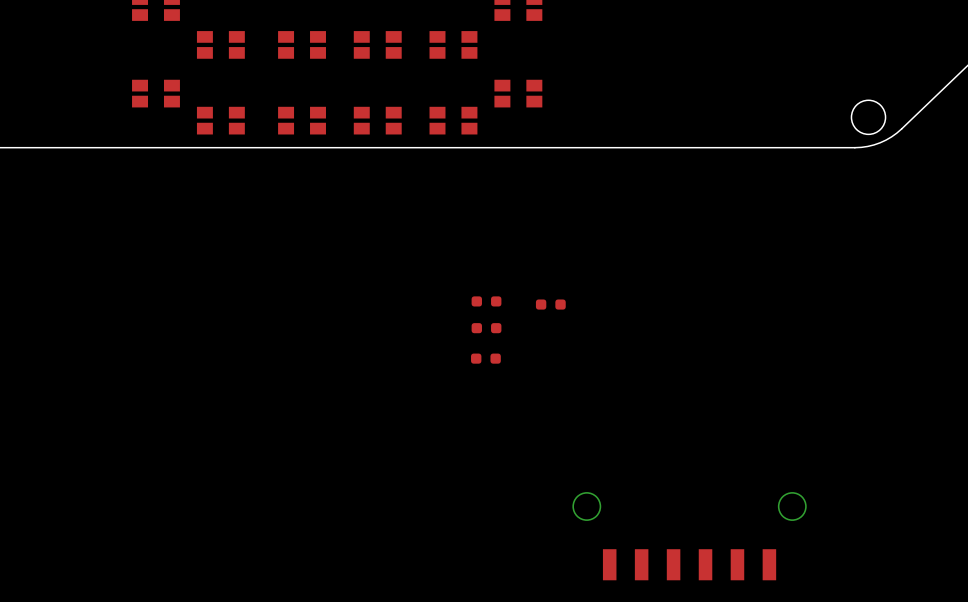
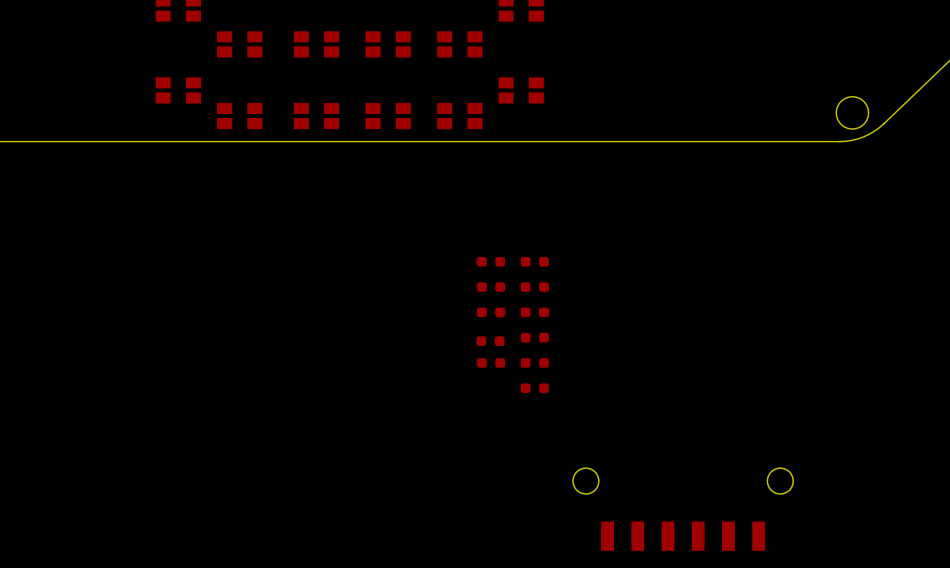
part: none -> (491, 261)
part: none -> (534, 261)
part: none -> (534, 287)
part: (550, 304) -> none
part: none -> (534, 312)
part: none -> (534, 337)
part: none -> (491, 362)
part: none -> (534, 362)
part: none -> (534, 388)

